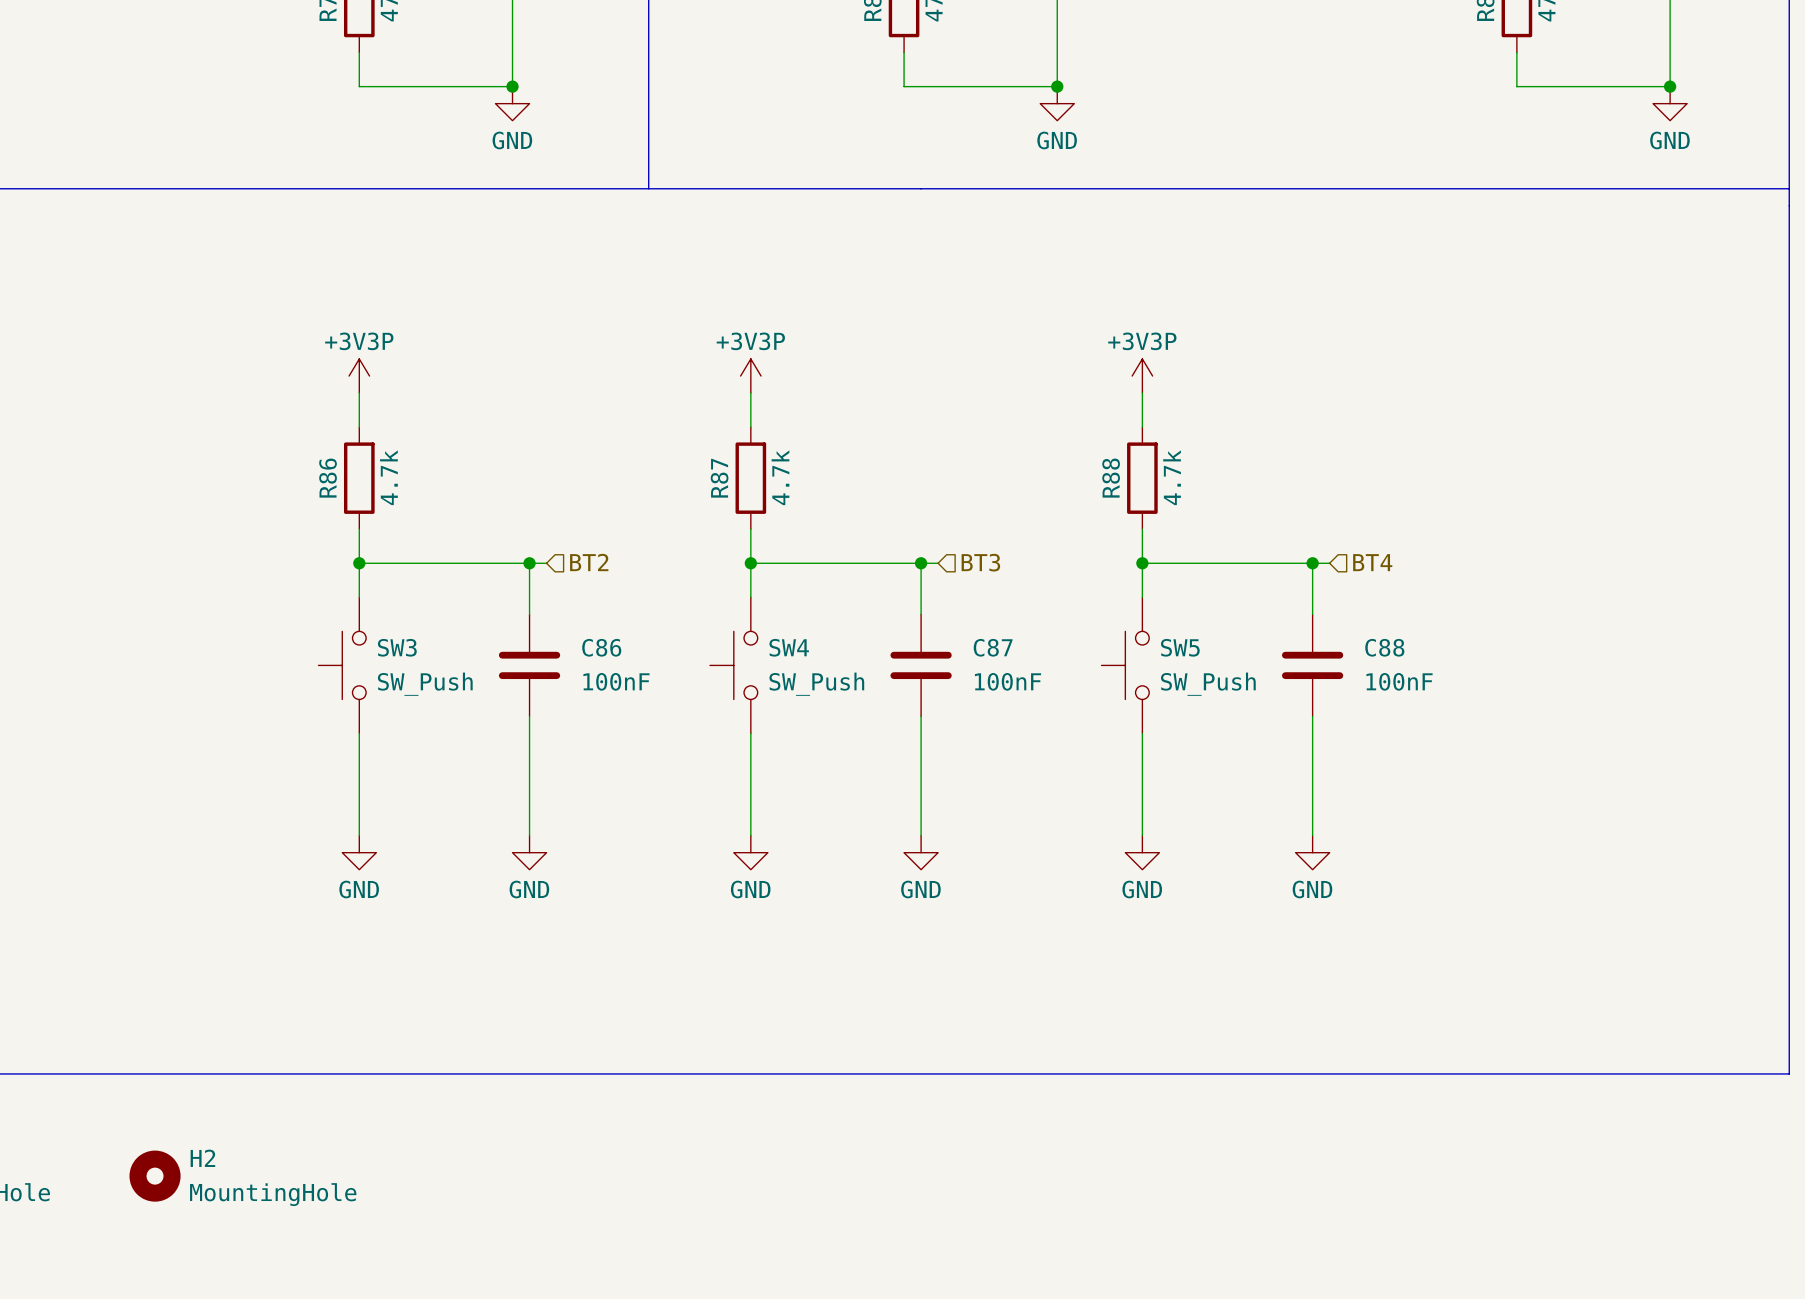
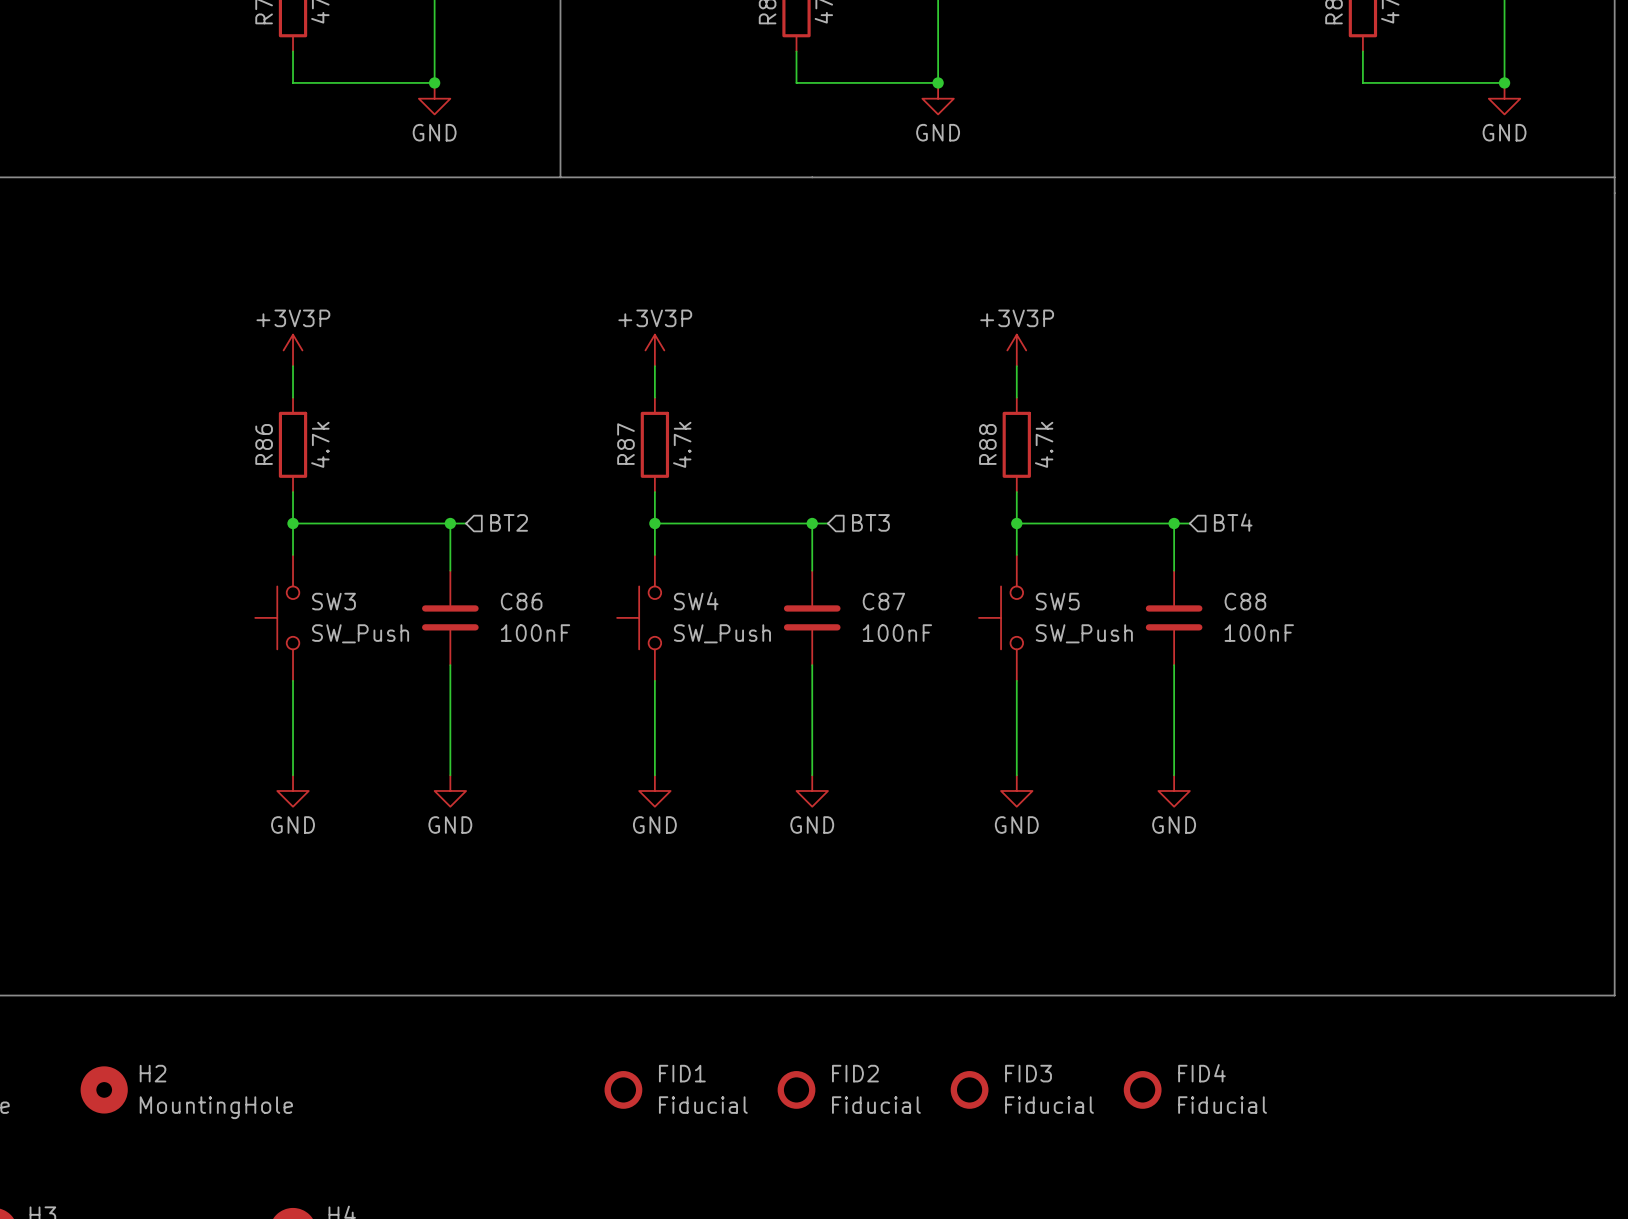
FID1: none -> Fiducial (623, 1089)
FID2: none -> Fiducial (796, 1089)
FID3: none -> Fiducial (969, 1089)
FID4: none -> Fiducial (1142, 1089)

